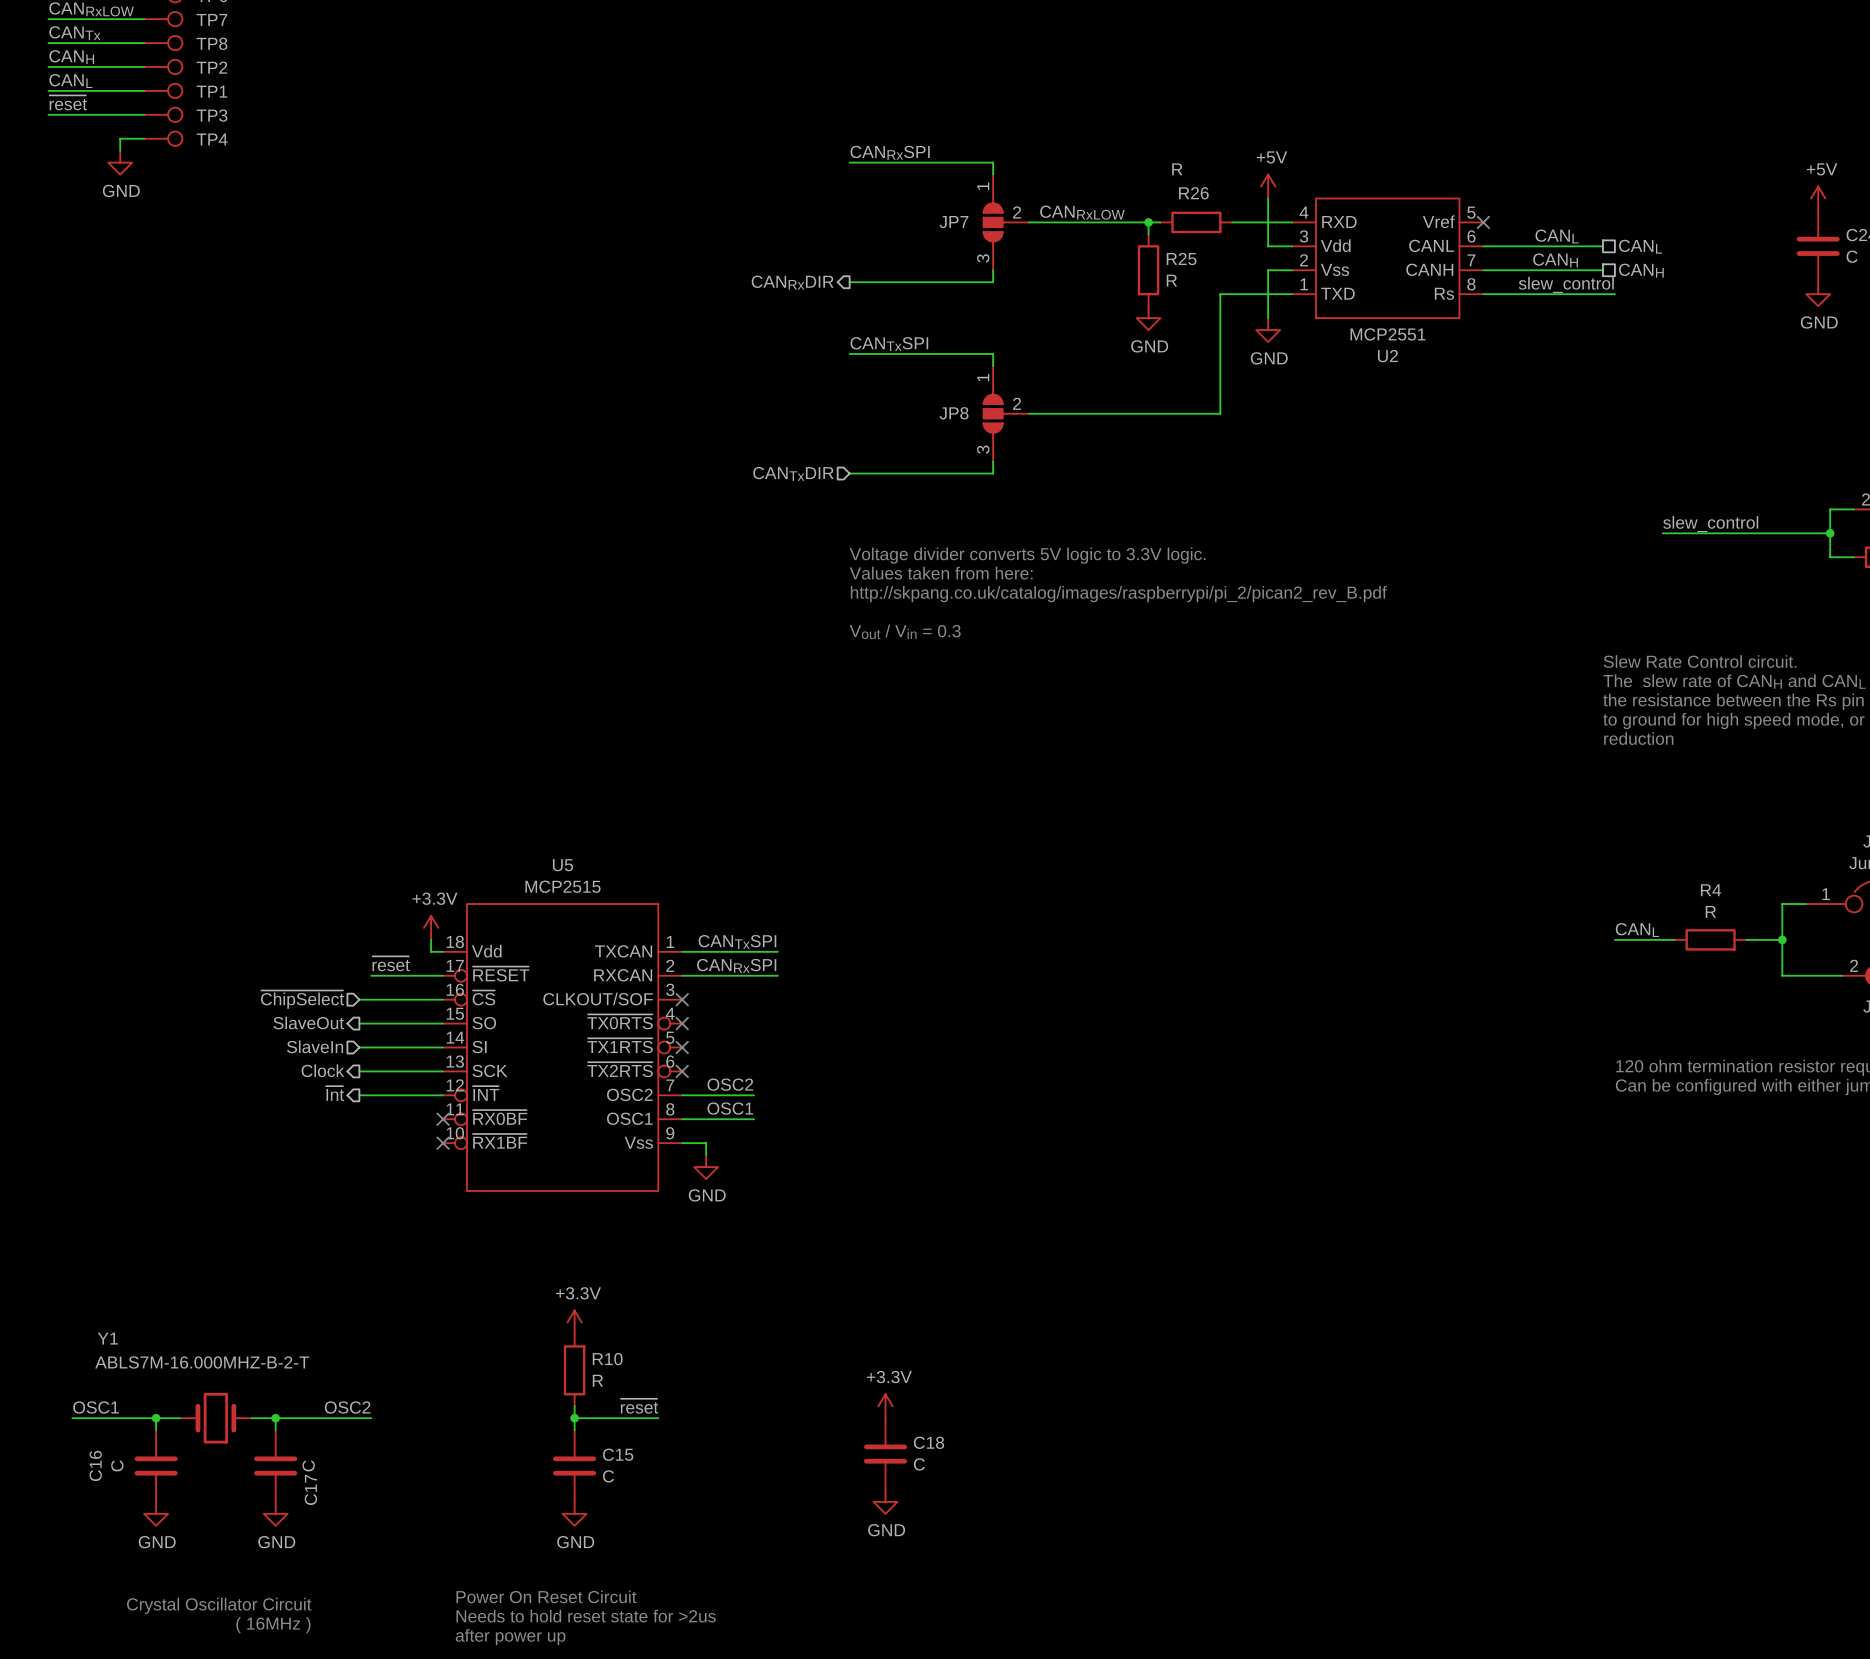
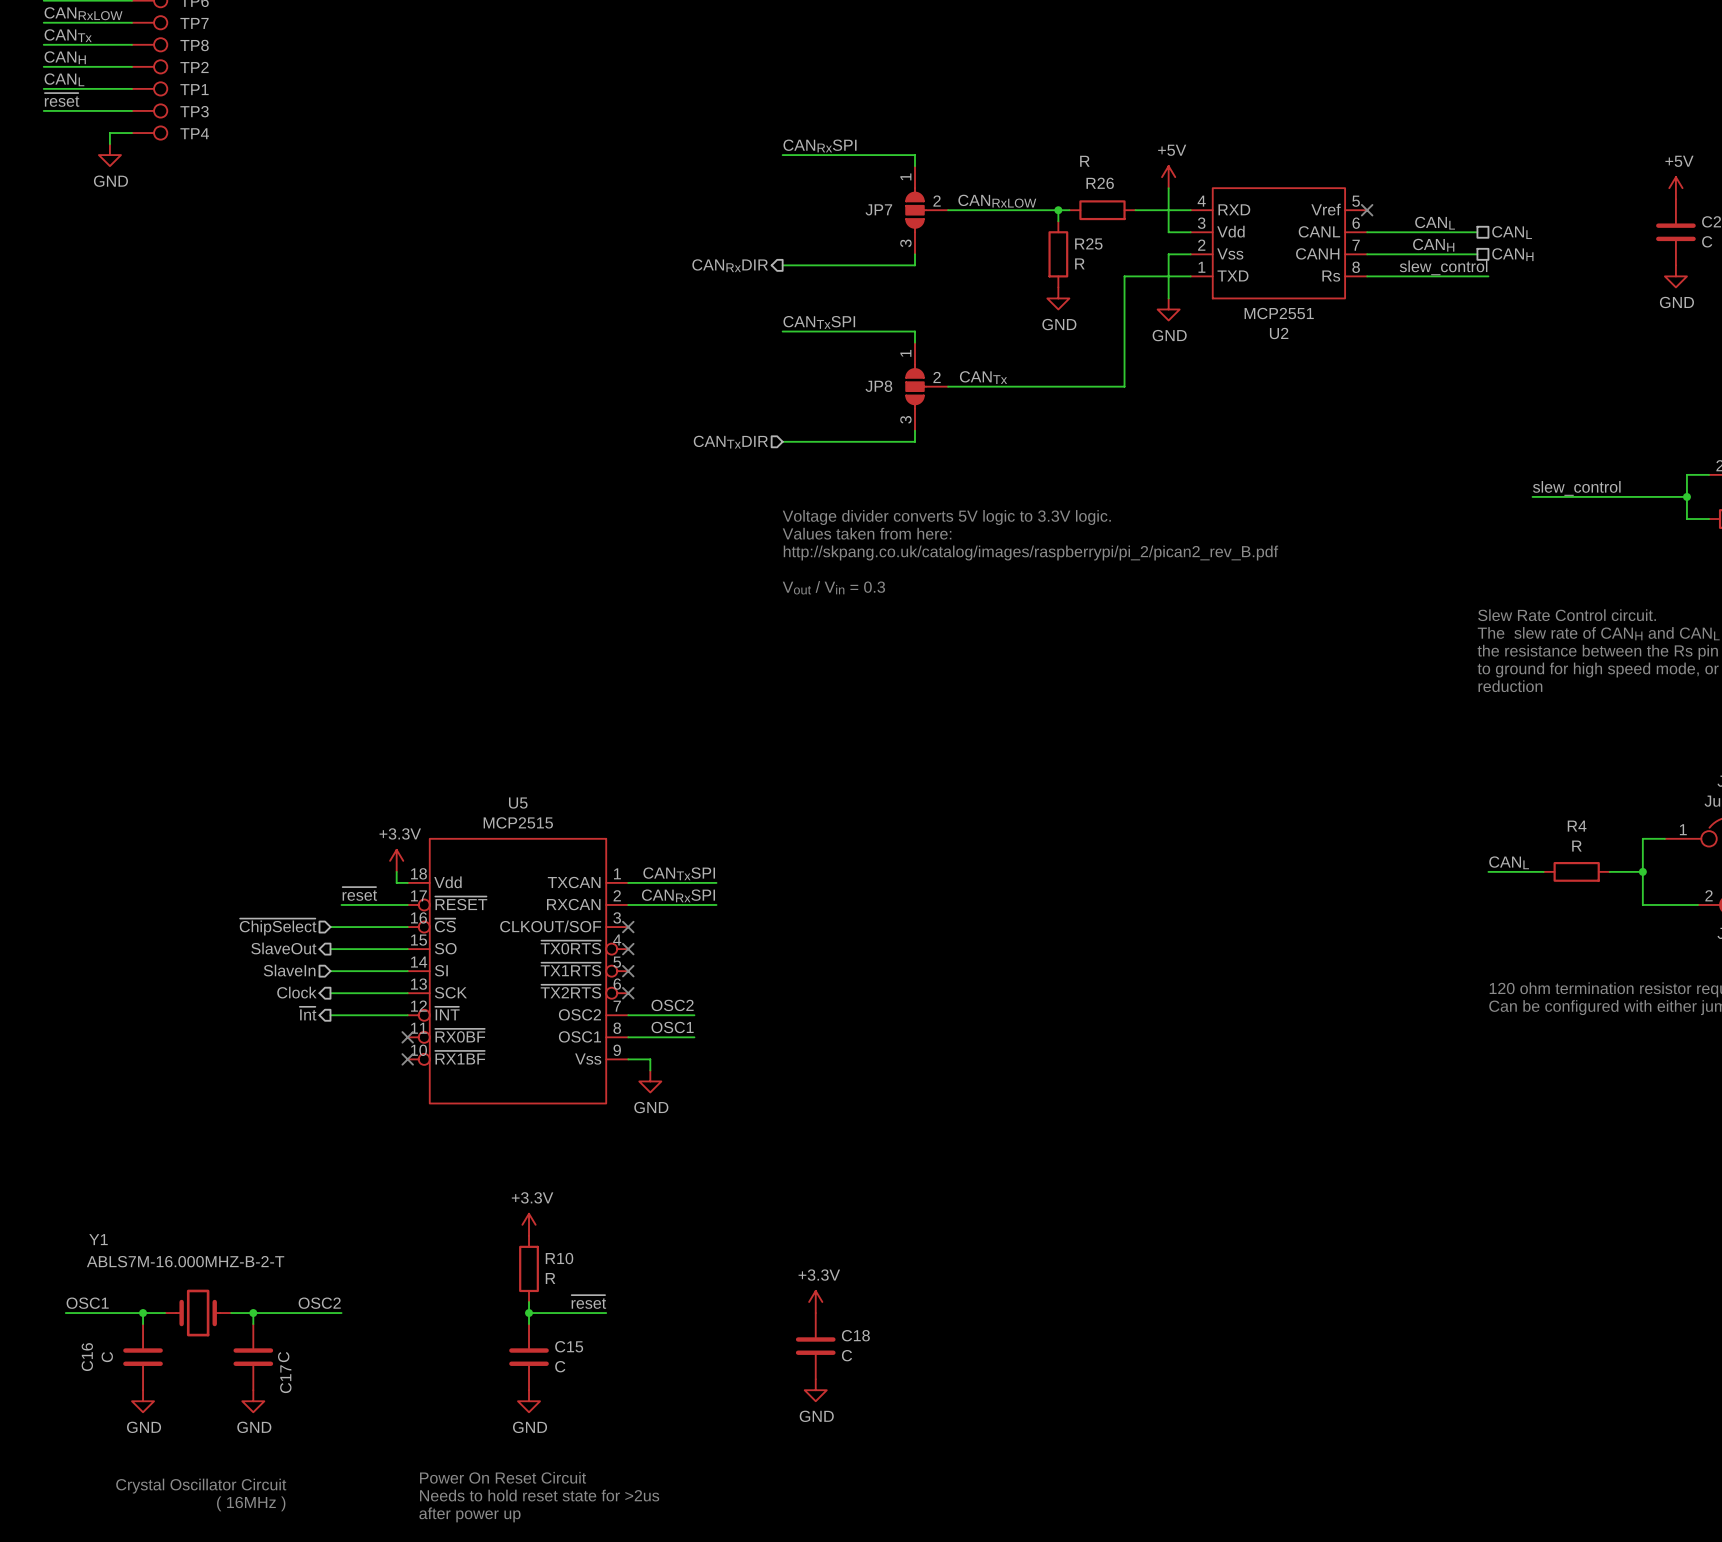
label: none -> CANTx (983, 377)

